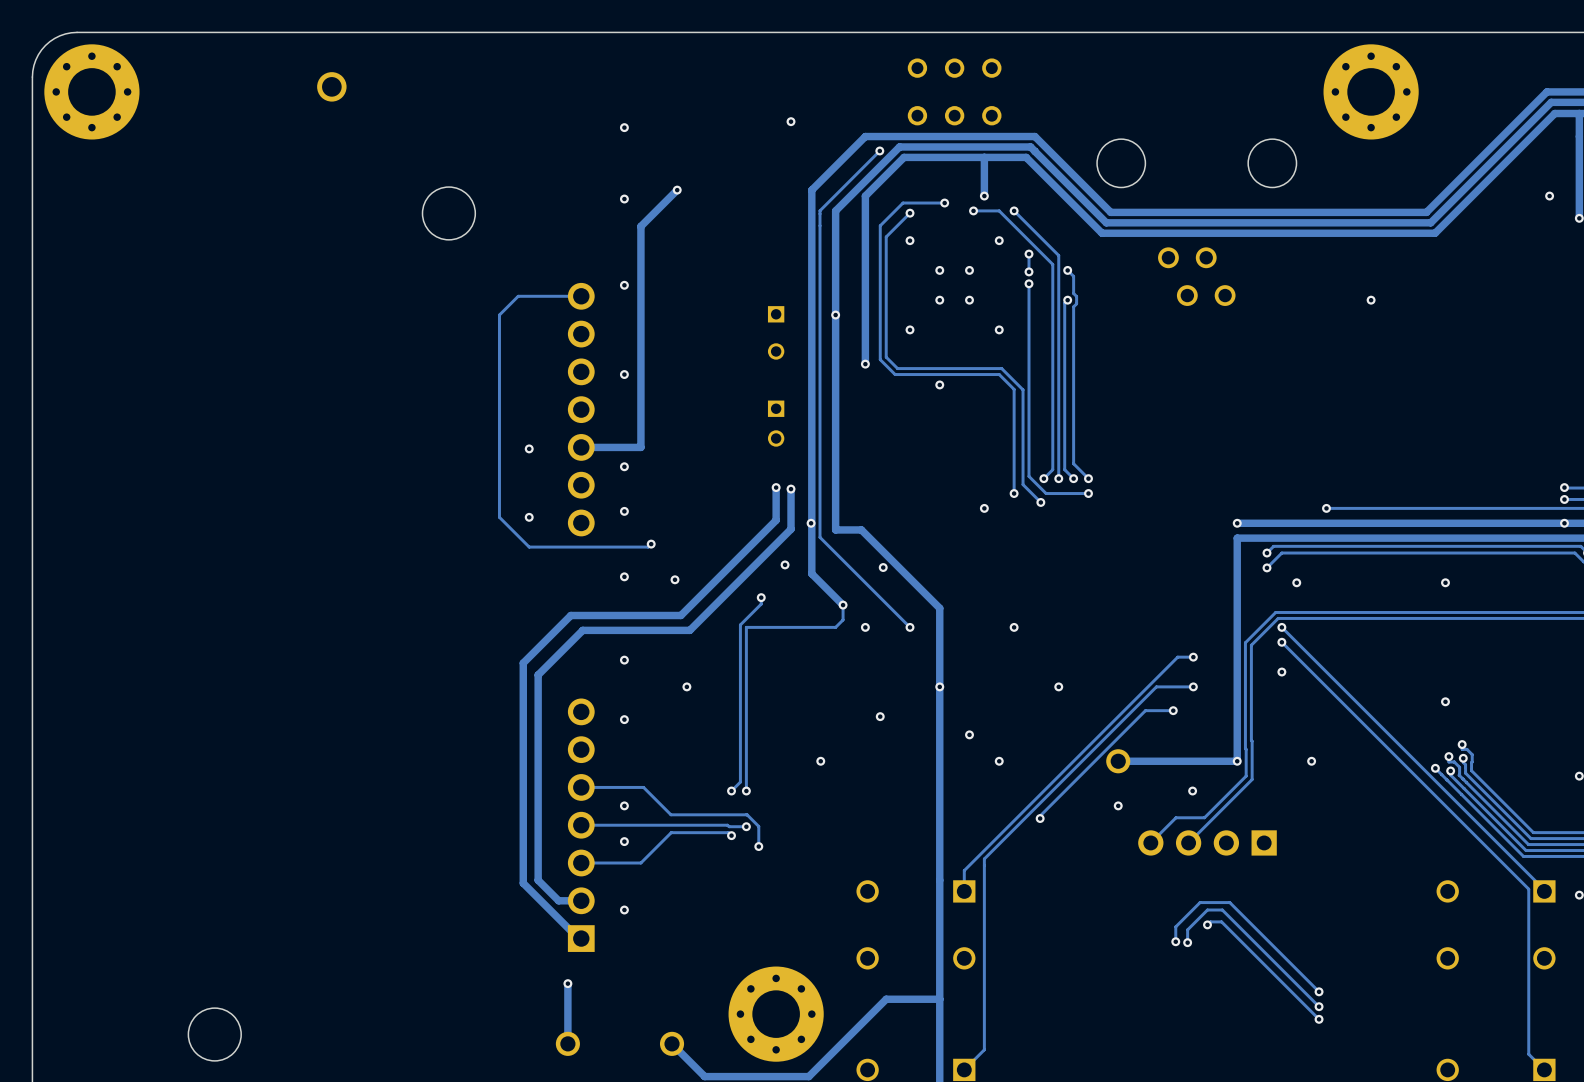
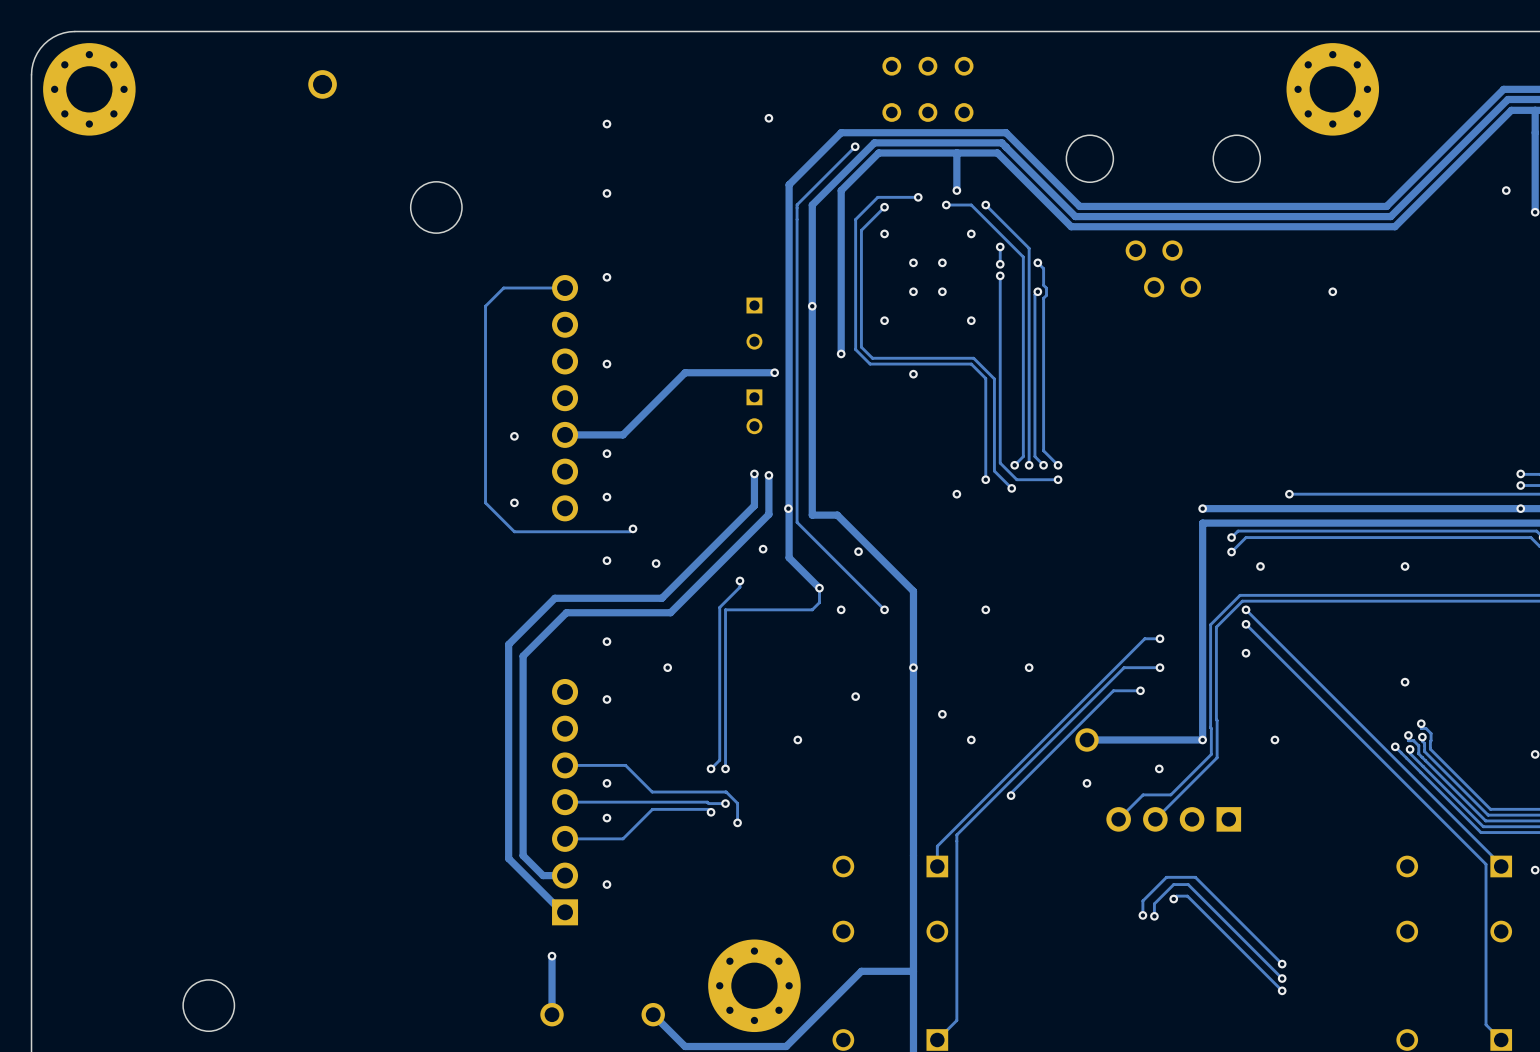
track: (677, 190) (640, 226) (640, 447) -> (774, 372) (685, 372) (623, 434)
via: (677, 190) -> none
via: none -> (774, 372)

